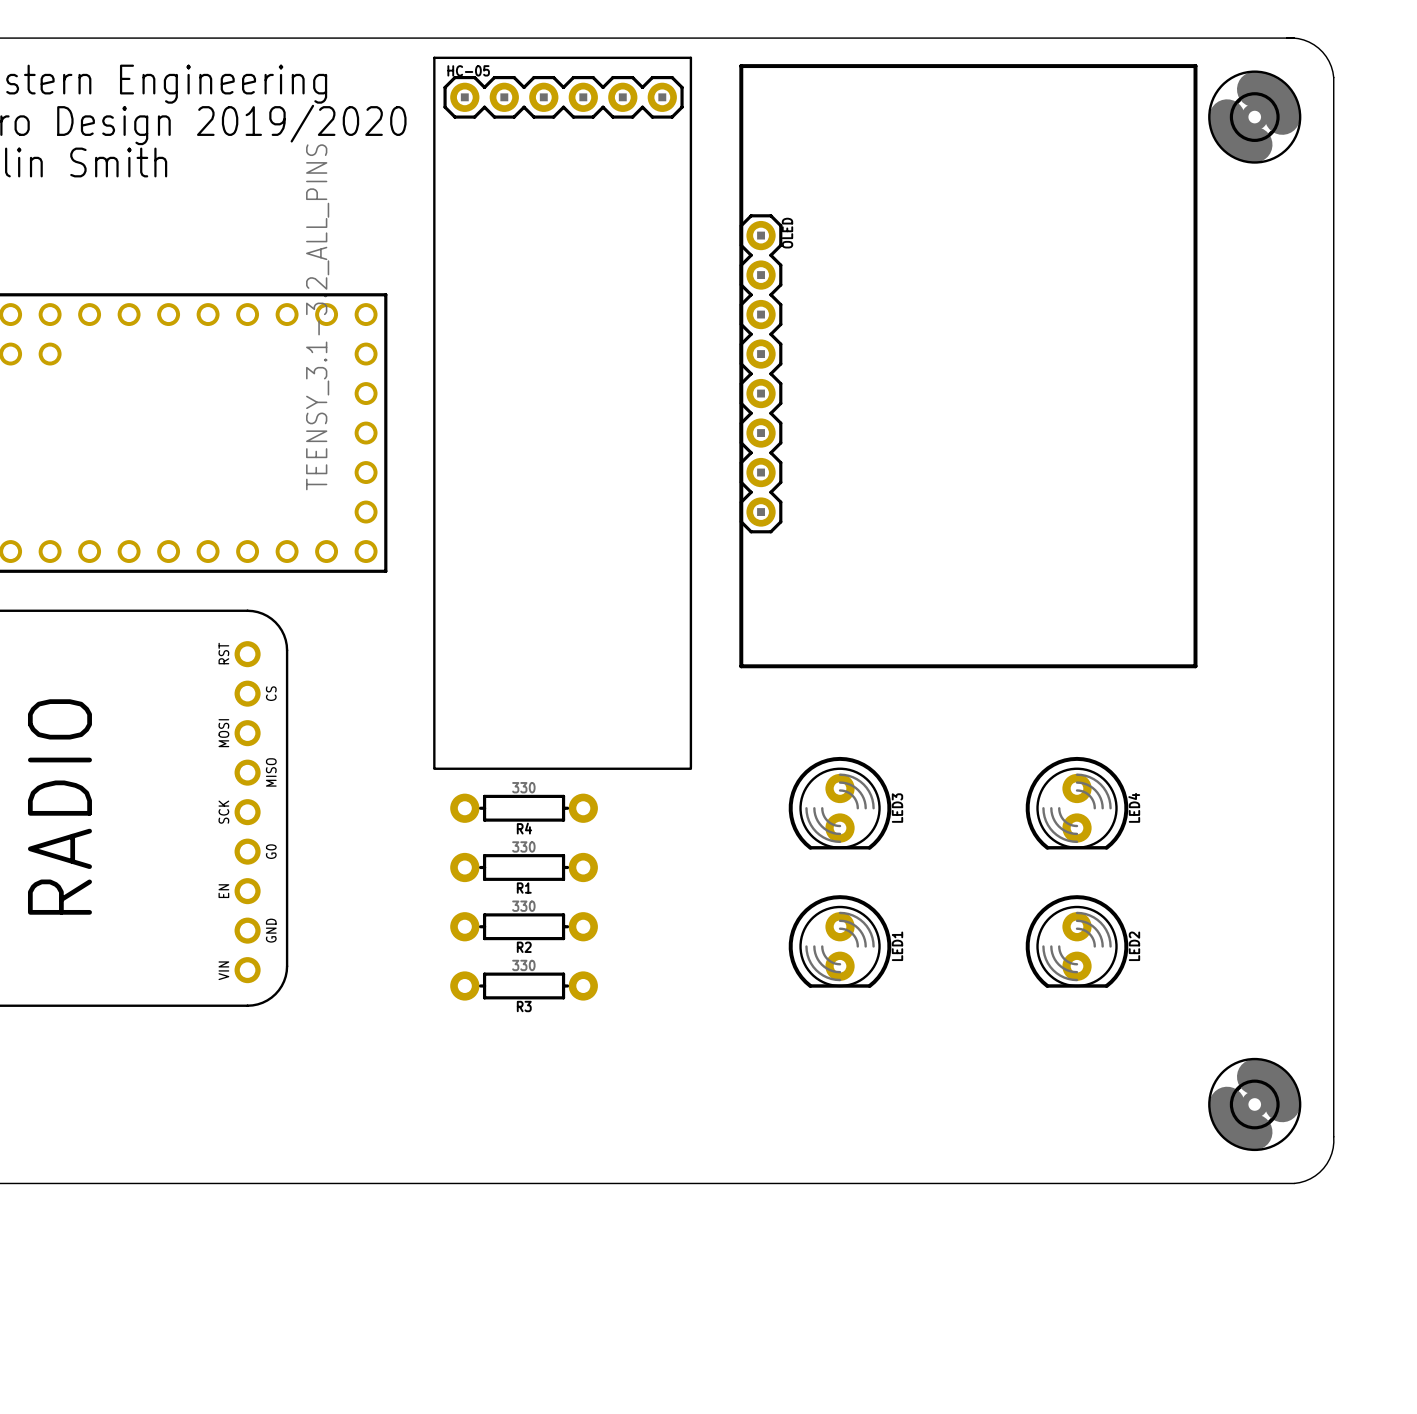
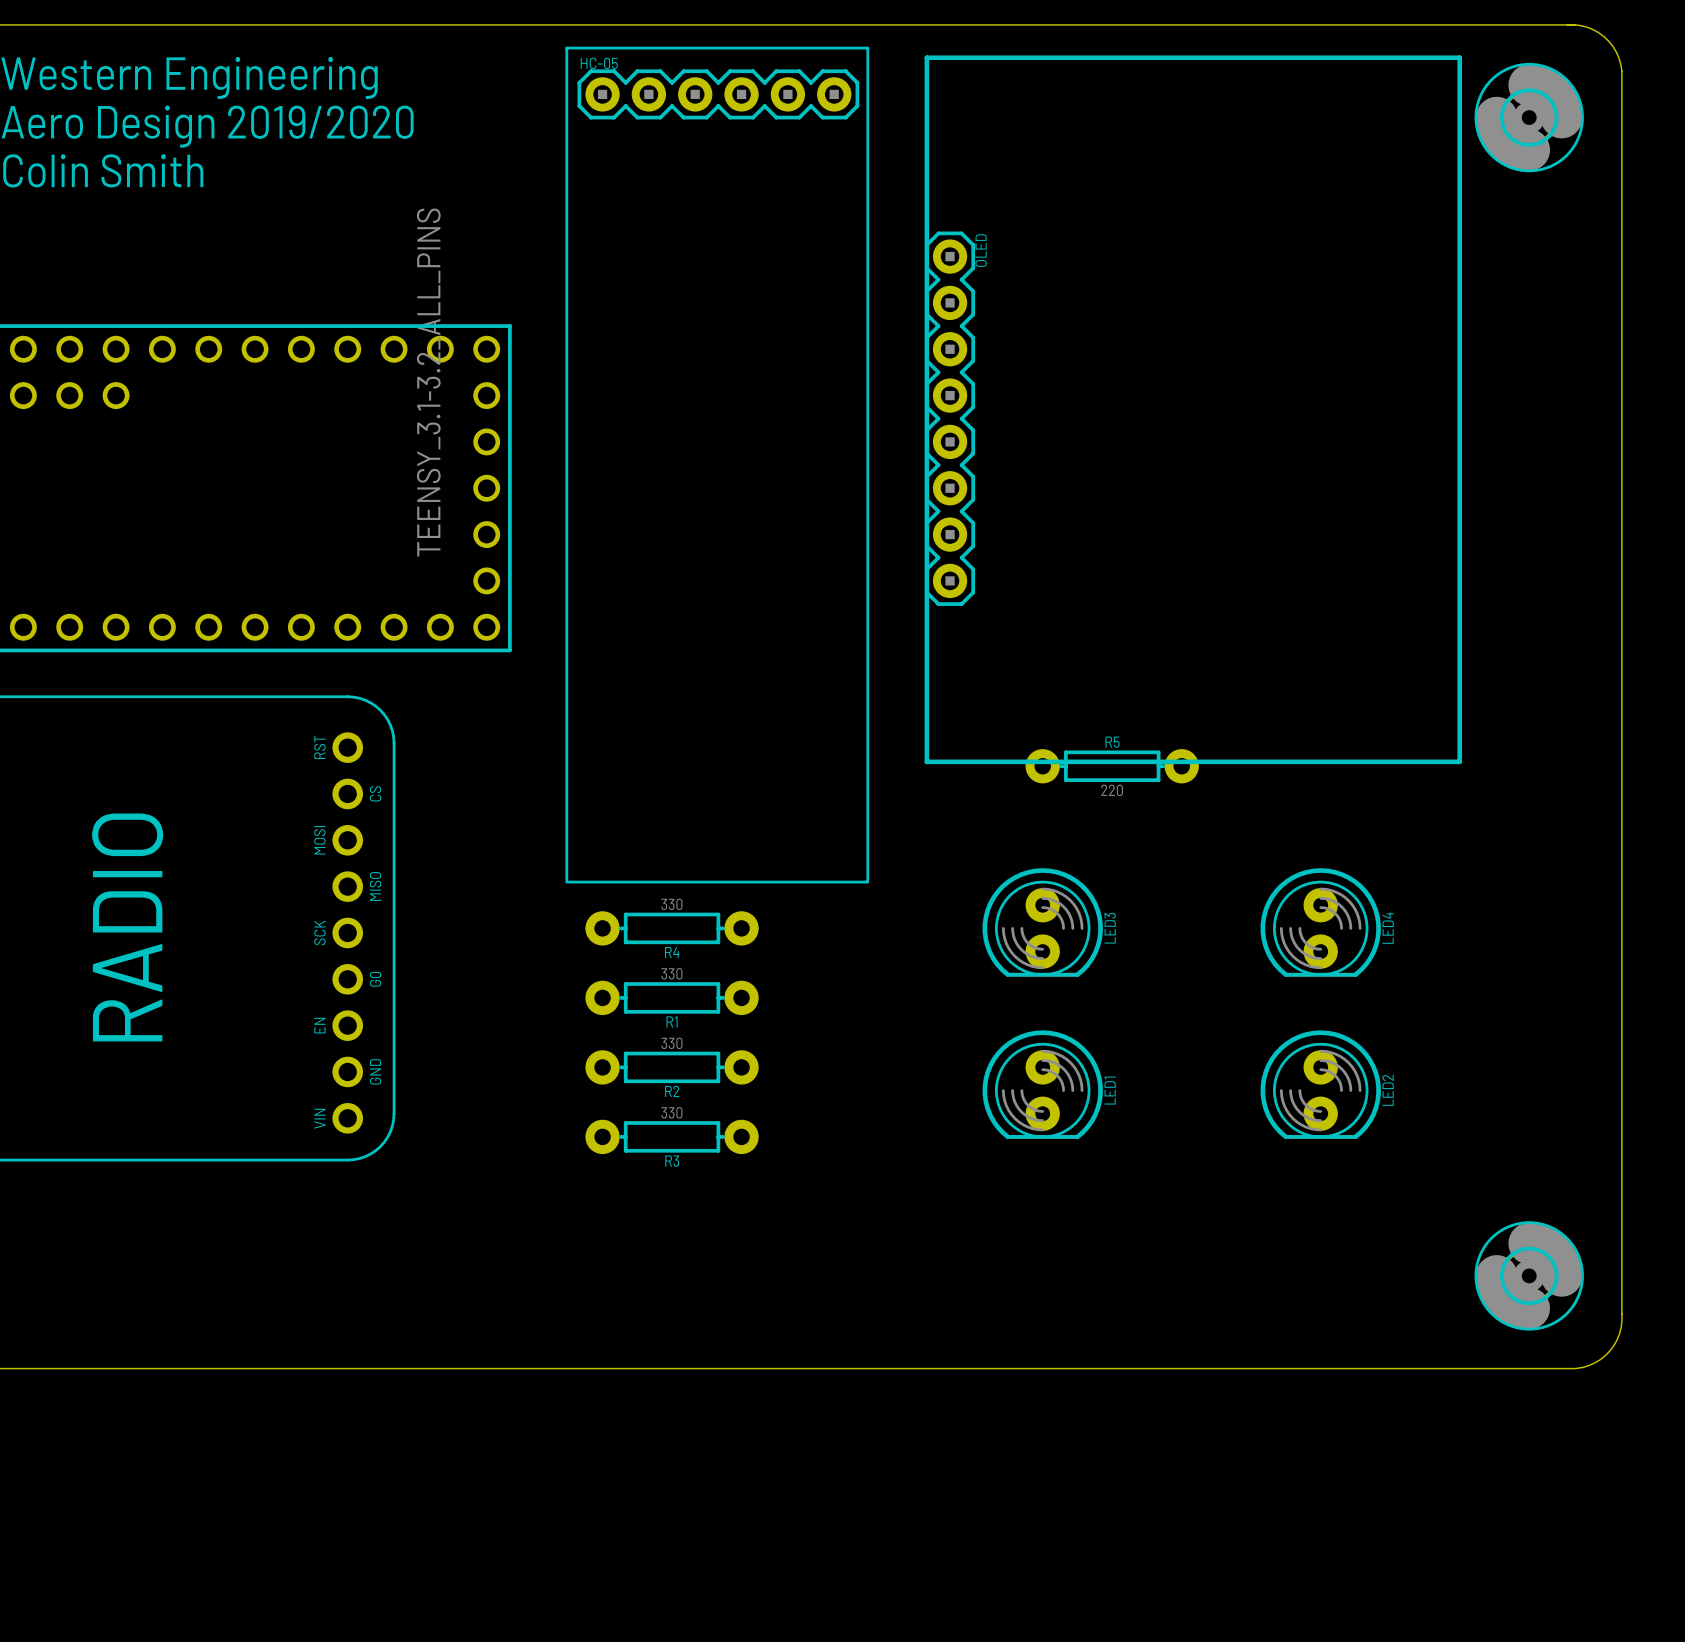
R5: none -> 220 (1112, 766)

